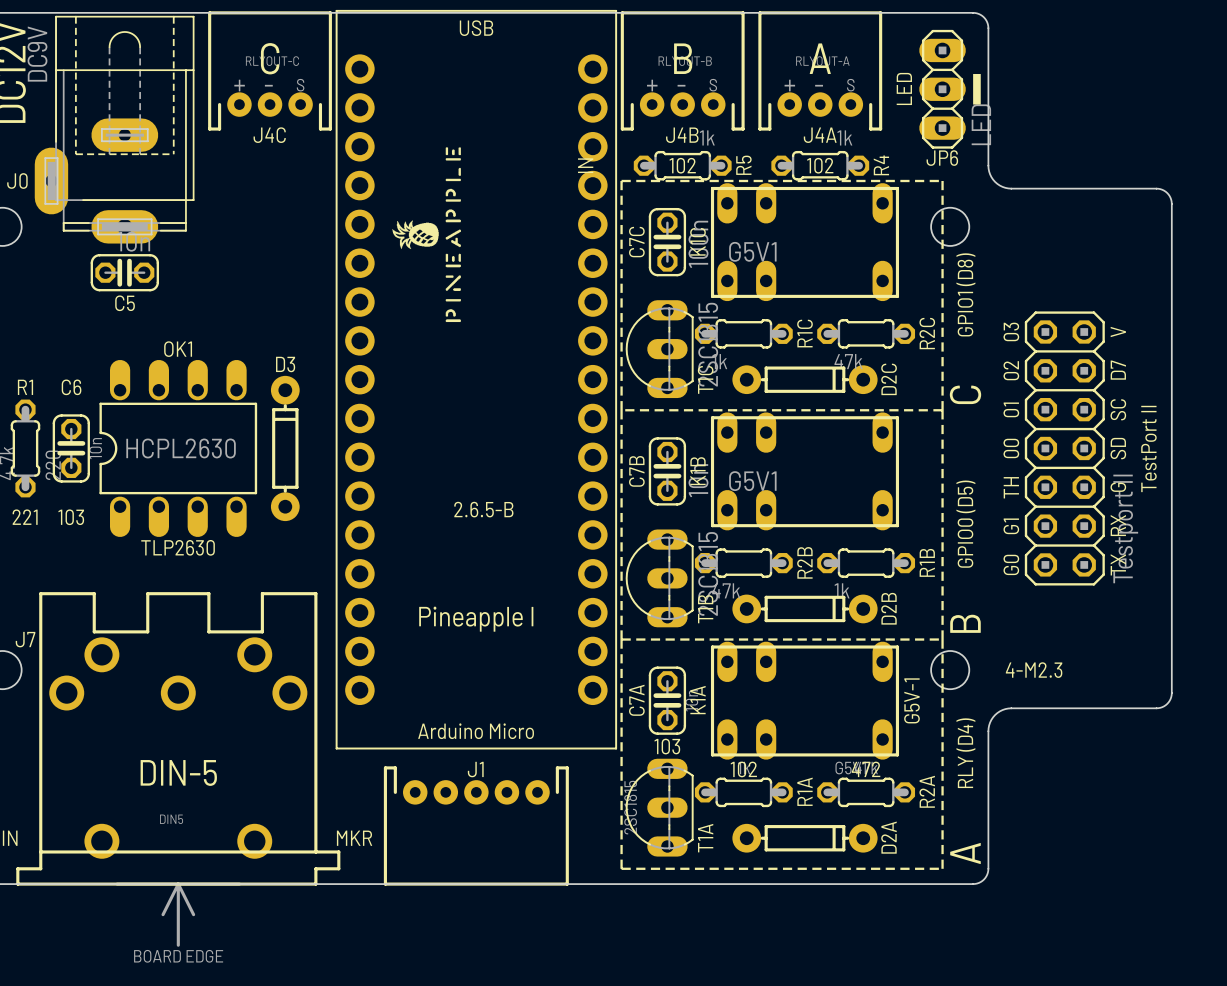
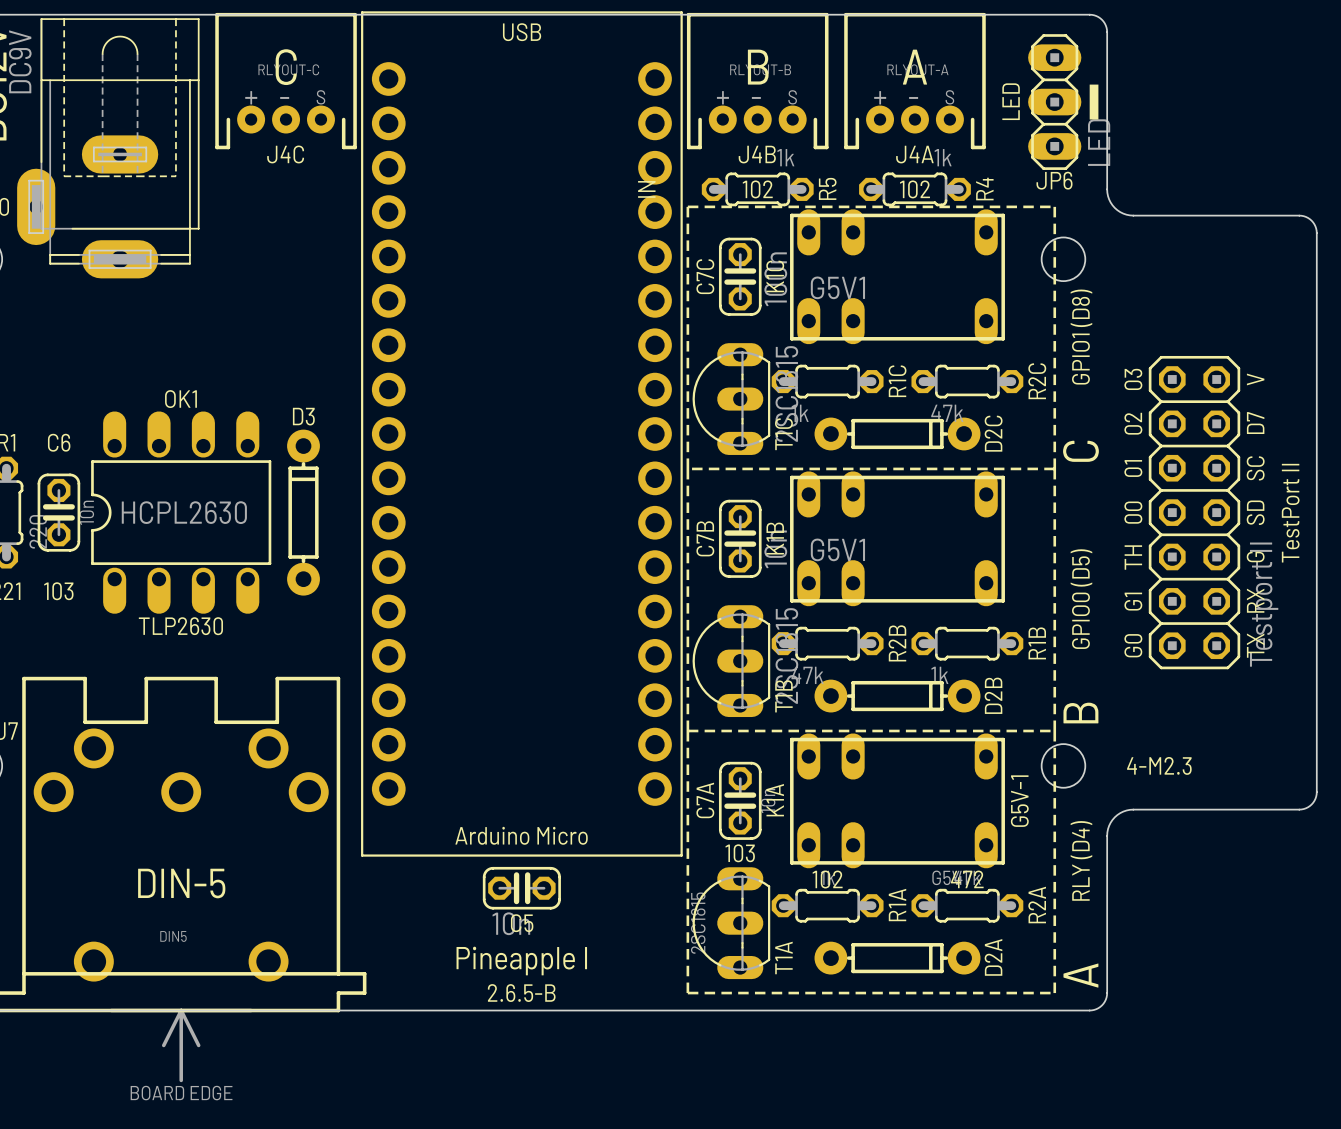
drawing: [392, 147, 461, 323] -> none
C5 rotation: 0° (124, 272) -> 180° (521, 888)
C5 position: (124, 272) -> (521, 888)
text position: 2.6.5-B (483, 509) -> 2.6.5-B (521, 993)
text position: Pineapple I (476, 619) -> Pineapple I (521, 961)
J1: (476, 826) -> none
text: MKR (354, 838) -> none

